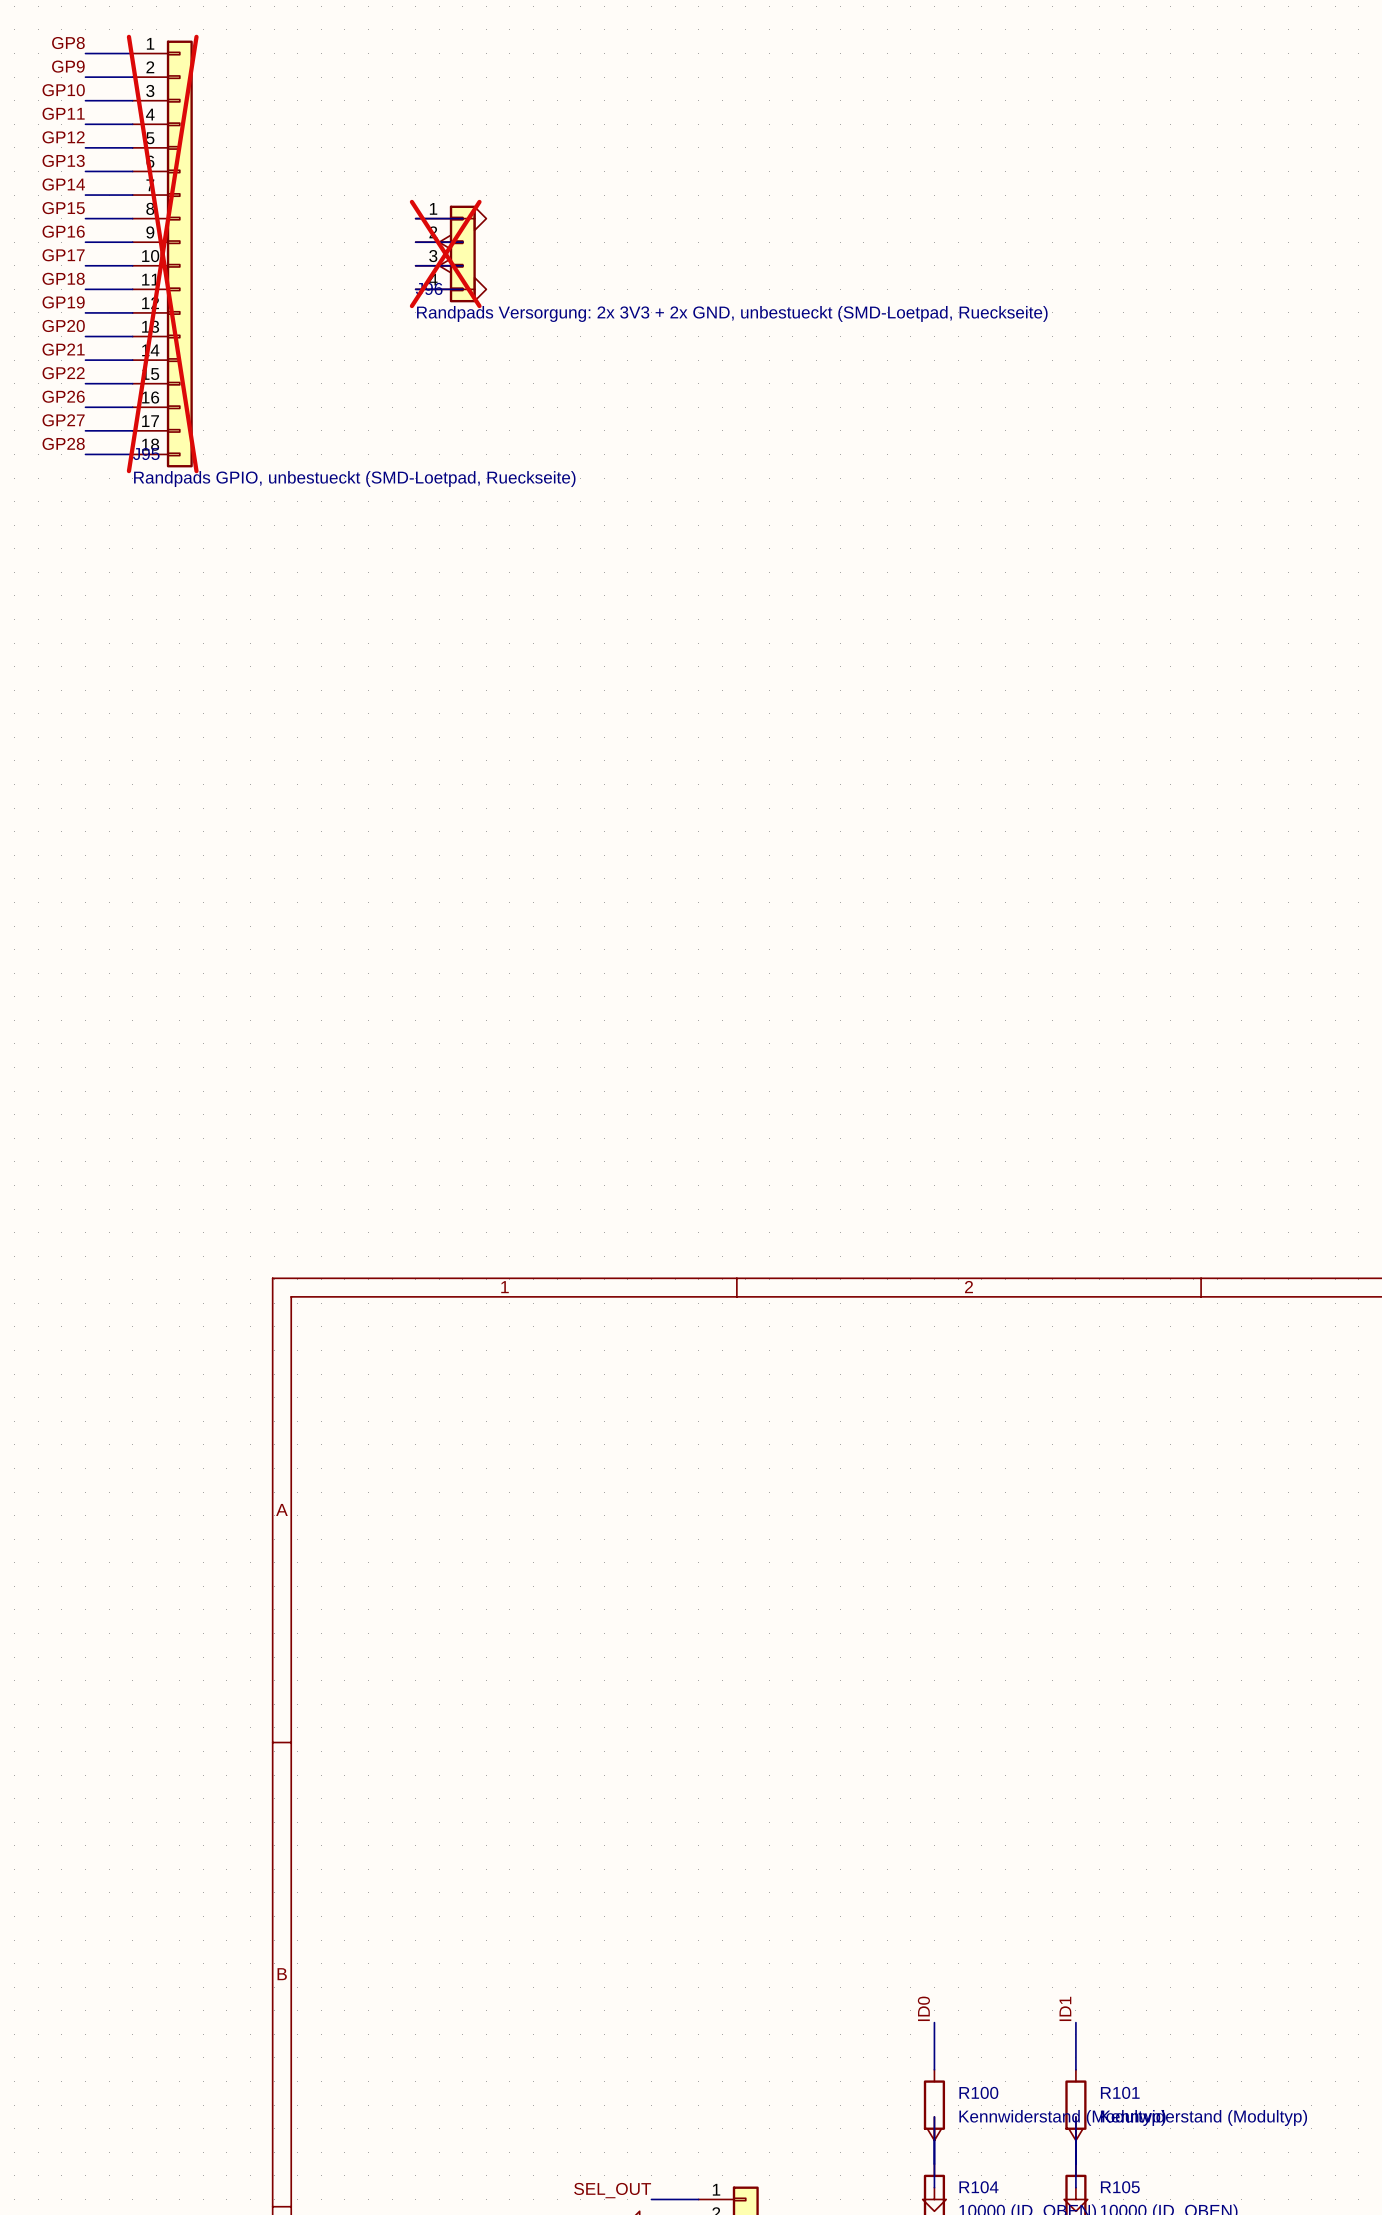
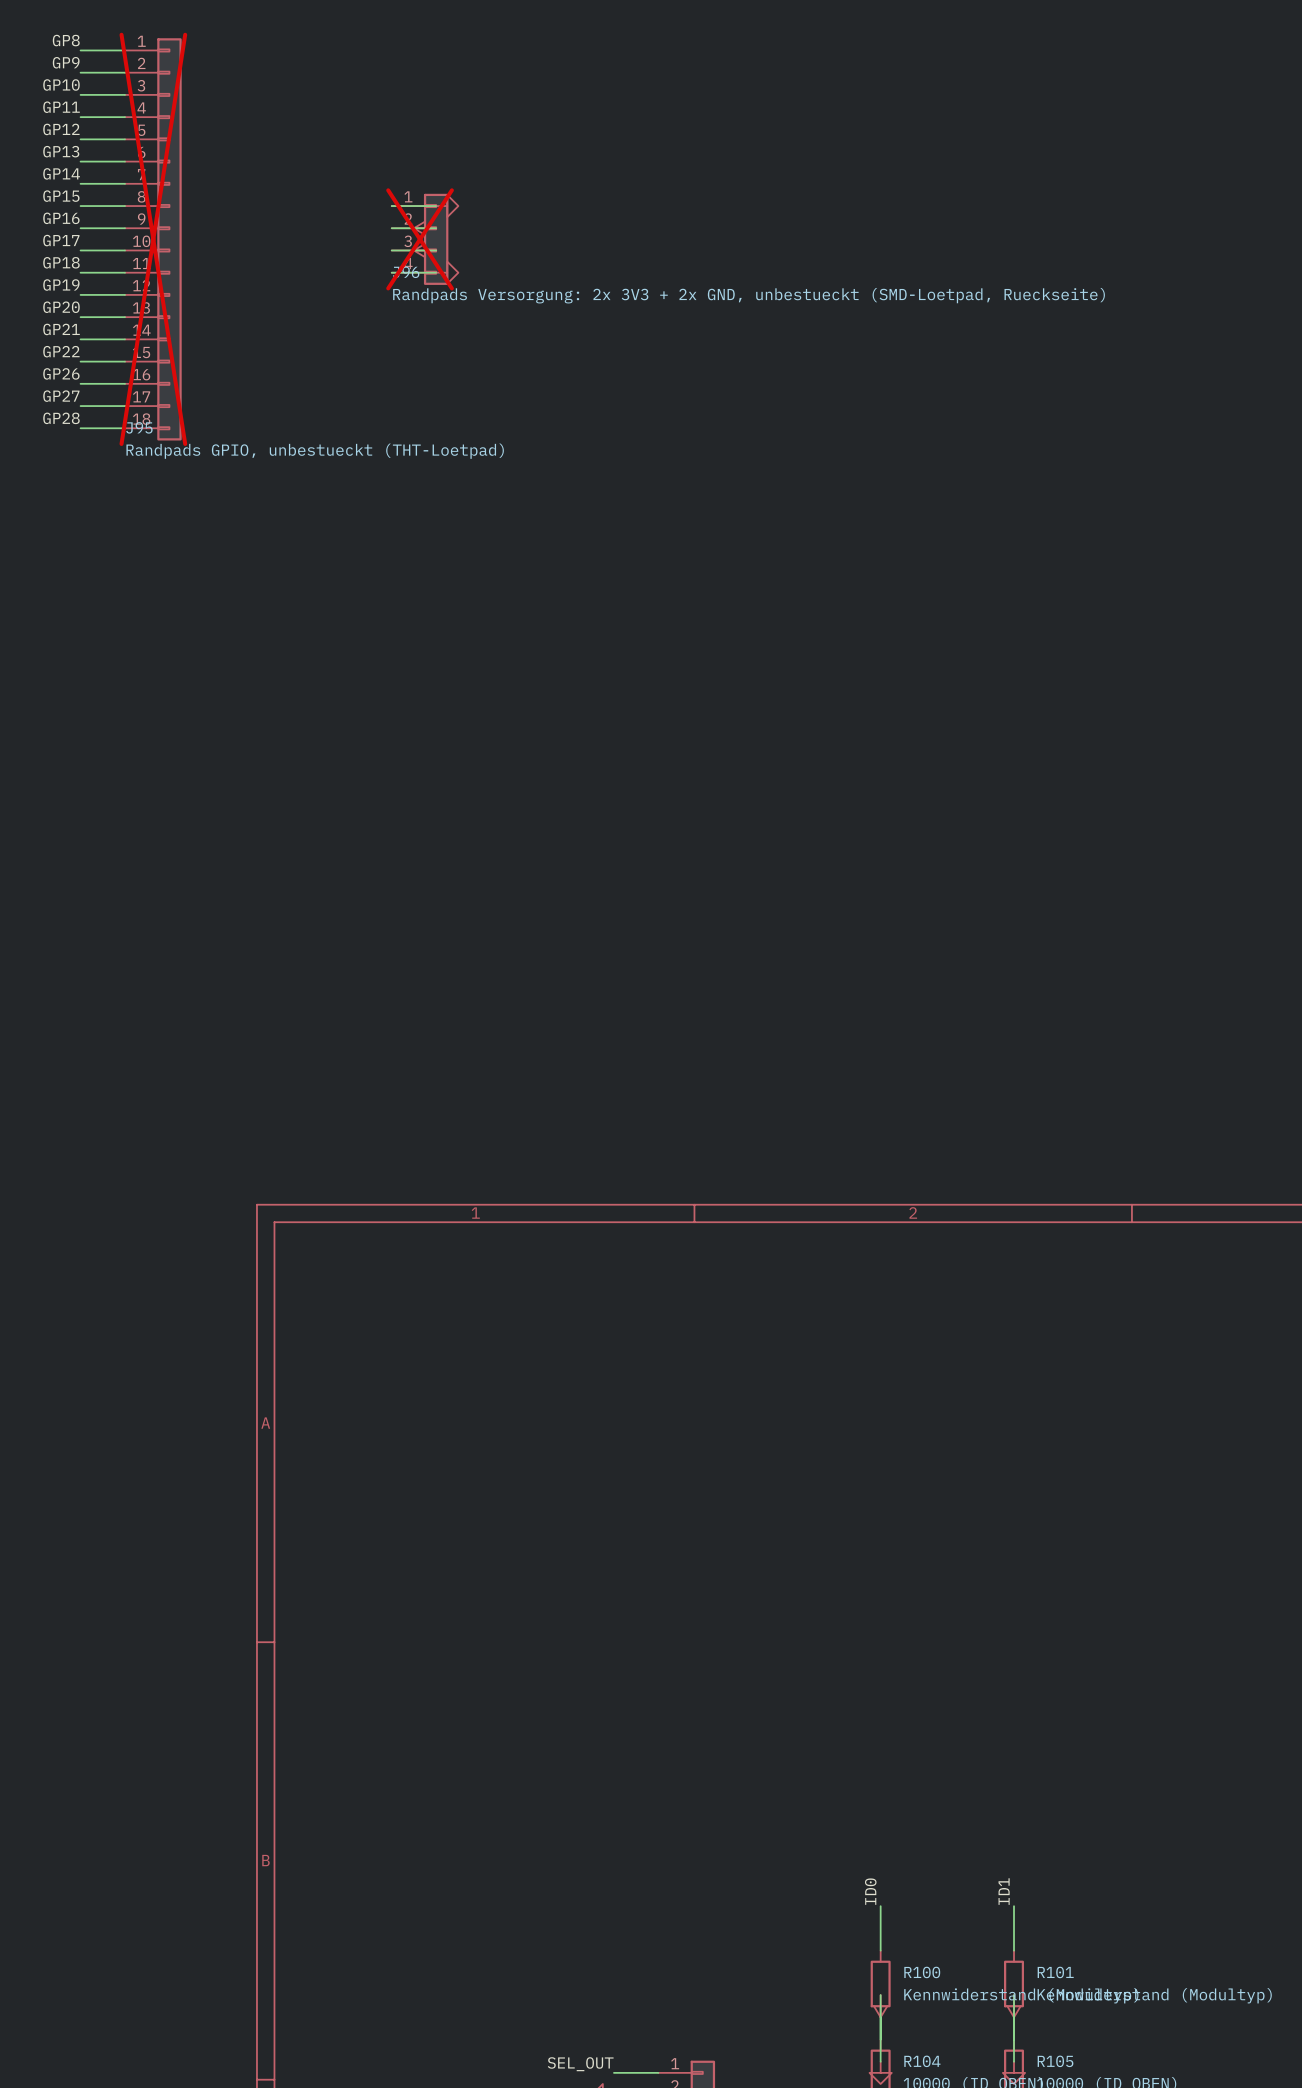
J95 value: Randpads GPIO, unbestueckt (SMD-Loetpad, Rueckseite) (354, 479) -> Randpads GPIO, unbestueckt (THT-Loetpad) (315, 451)

